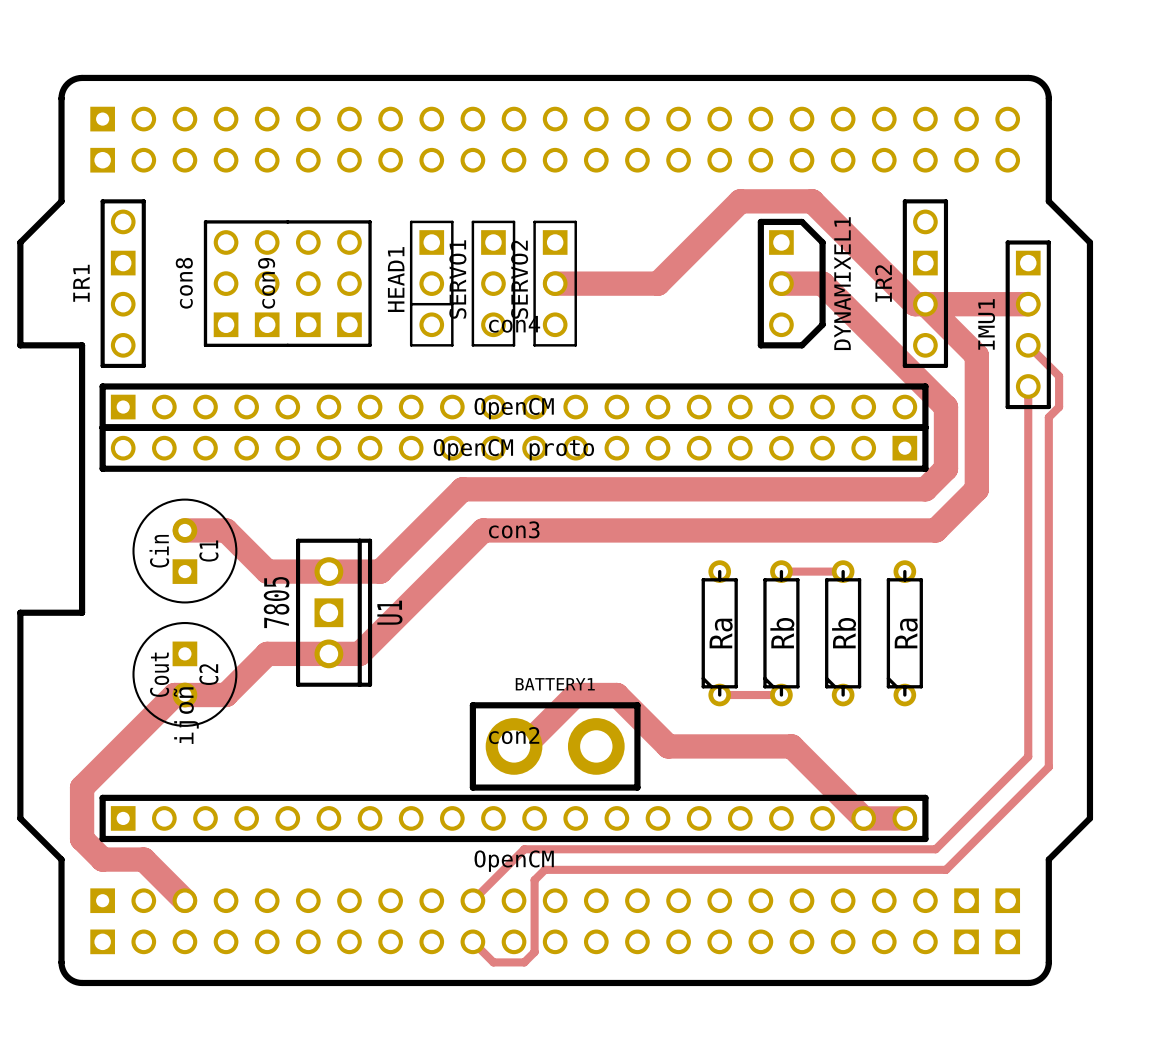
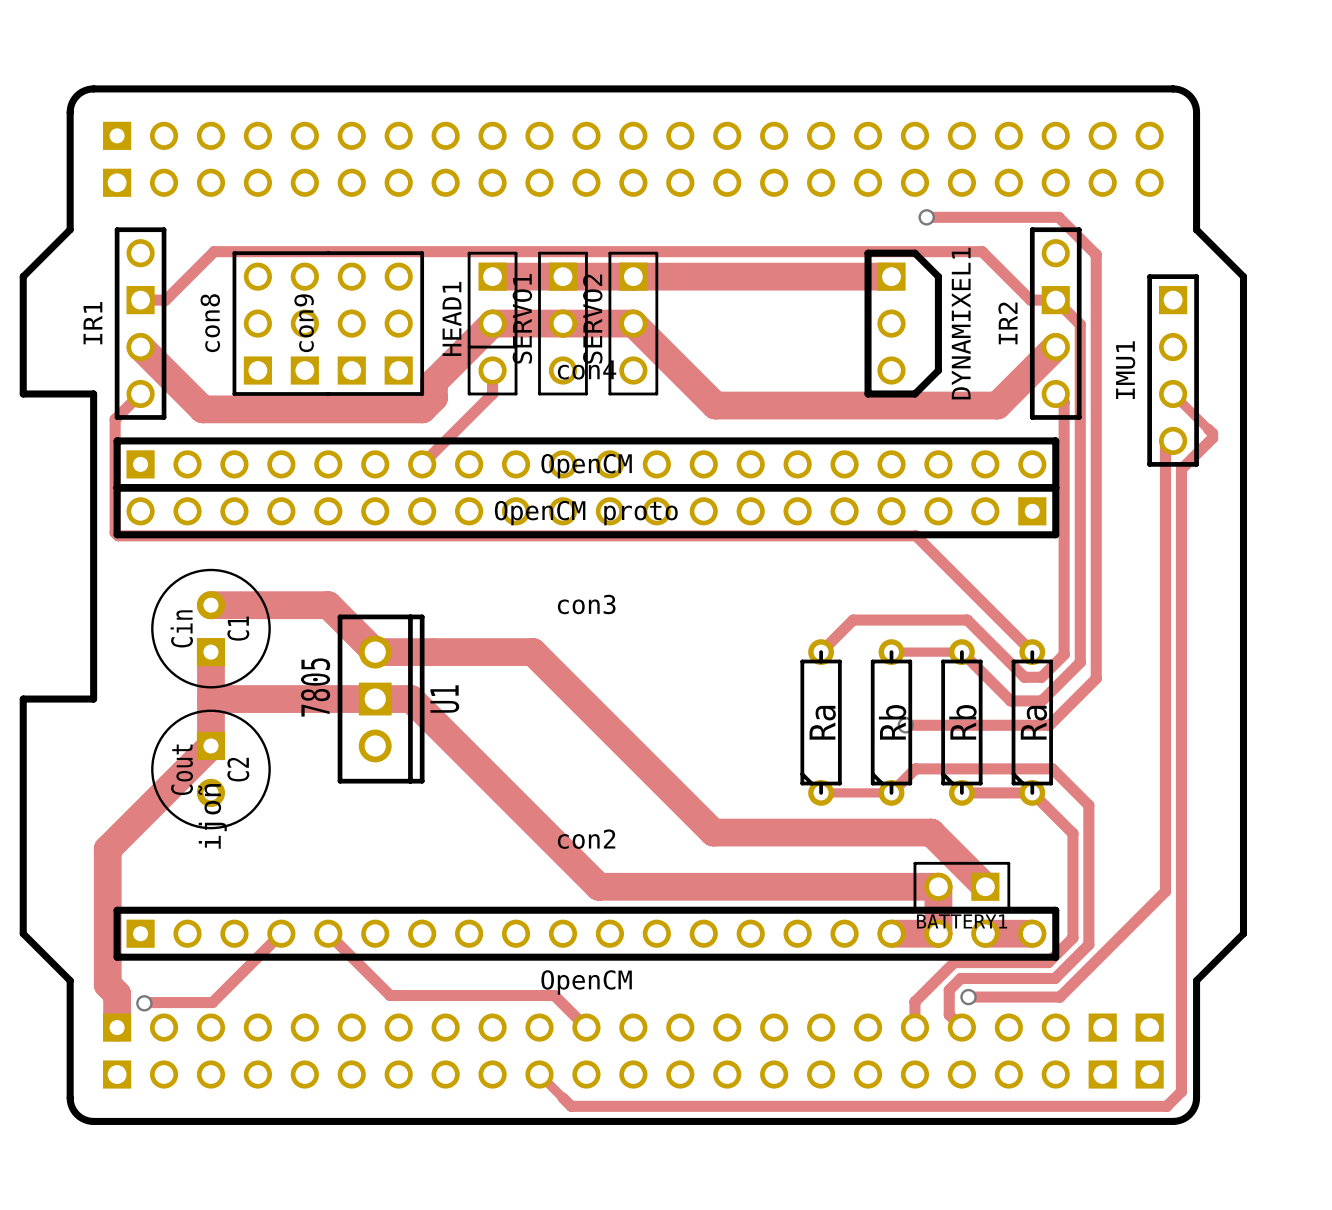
track: none -> (926, 217) (1058, 217) (1096, 254) (1096, 678) (1049, 725) (905, 725)
via: none -> (926, 217)
track: none -> (492, 276) (891, 276)
track: none -> (140, 300) (165, 300) (214, 251) (982, 251) (1030, 300) (1055, 300) (1080, 324) (1080, 662) (1041, 700) (1010, 700) (961, 652)
track: (555, 283) (658, 283) (740, 201) (812, 201) (915, 304) (1028, 304) -> none
track: (781, 283) (822, 283) (945, 407) (945, 468) (925, 489) (462, 489) (380, 571) -> (985, 886) (931, 832) (713, 832) (532, 652) (433, 652)
track: (925, 304) (976, 355) (976, 489) (935, 530) (483, 530) (359, 653) (267, 653) (226, 695) (174, 695) (82, 787) (82, 839) (102, 859) (143, 859) (184, 900) -> (1055, 347) (997, 405) (715, 405) (633, 323) (492, 323) (433, 382) (433, 397) (422, 409) (202, 409) (140, 347)
track: none -> (492, 370) (492, 393) (422, 464)
track: none -> (140, 393) (115, 419) (115, 532) (118, 535) (916, 535) (1032, 652)
track: none -> (1055, 393) (1064, 402) (1064, 654) (1041, 677) (1024, 677) (967, 620) (853, 620) (821, 652)
track: (1059, 376) (1059, 407) (1048, 417) (1048, 767) (945, 869) (544, 869) (534, 880) (534, 952) (524, 962) (493, 962) -> (1208, 429) (1212, 433) (1212, 438) (1181, 469) (1181, 1091) (1166, 1106) (571, 1106) (562, 1097)
track: (1028, 386) (1028, 756) (935, 849) (524, 849) (472, 900) -> (1173, 440) (1165, 448) (1165, 891) (1059, 997) (968, 997)
track: (226, 530) (267, 571) (328, 571) -> (257, 605) (328, 605) (375, 652)
track: none -> (210, 652) (210, 745) (107, 849) (107, 984) (117, 994) (117, 1027)
track: none -> (210, 699) (411, 699) (598, 886) (938, 886) (938, 933) (891, 933)
via: none -> (905, 725)
BATTERY1 name position: BATTERY1 (555, 684) -> BATTERY1 (962, 921)
track: none -> (891, 792) (915, 768) (1052, 768) (1088, 805) (1088, 944) (1055, 978) (960, 978) (949, 990) (949, 1014) (961, 1027)
track: none -> (961, 792) (1032, 792) (1072, 833) (1072, 938) (1048, 962) (954, 962) (914, 1001) (914, 1027)
BATTERY1 footprint: [469, 702, 641, 791] -> [913, 861, 1011, 912]
track: (514, 746) (524, 746) (575, 695) (616, 695) (668, 746) (791, 746) (863, 818) -> none
track: none -> (281, 933) (212, 1002) (144, 1003)
track: none -> (328, 933) (390, 995) (554, 995) (586, 1027)
via: none -> (968, 997)
via: none -> (144, 1003)

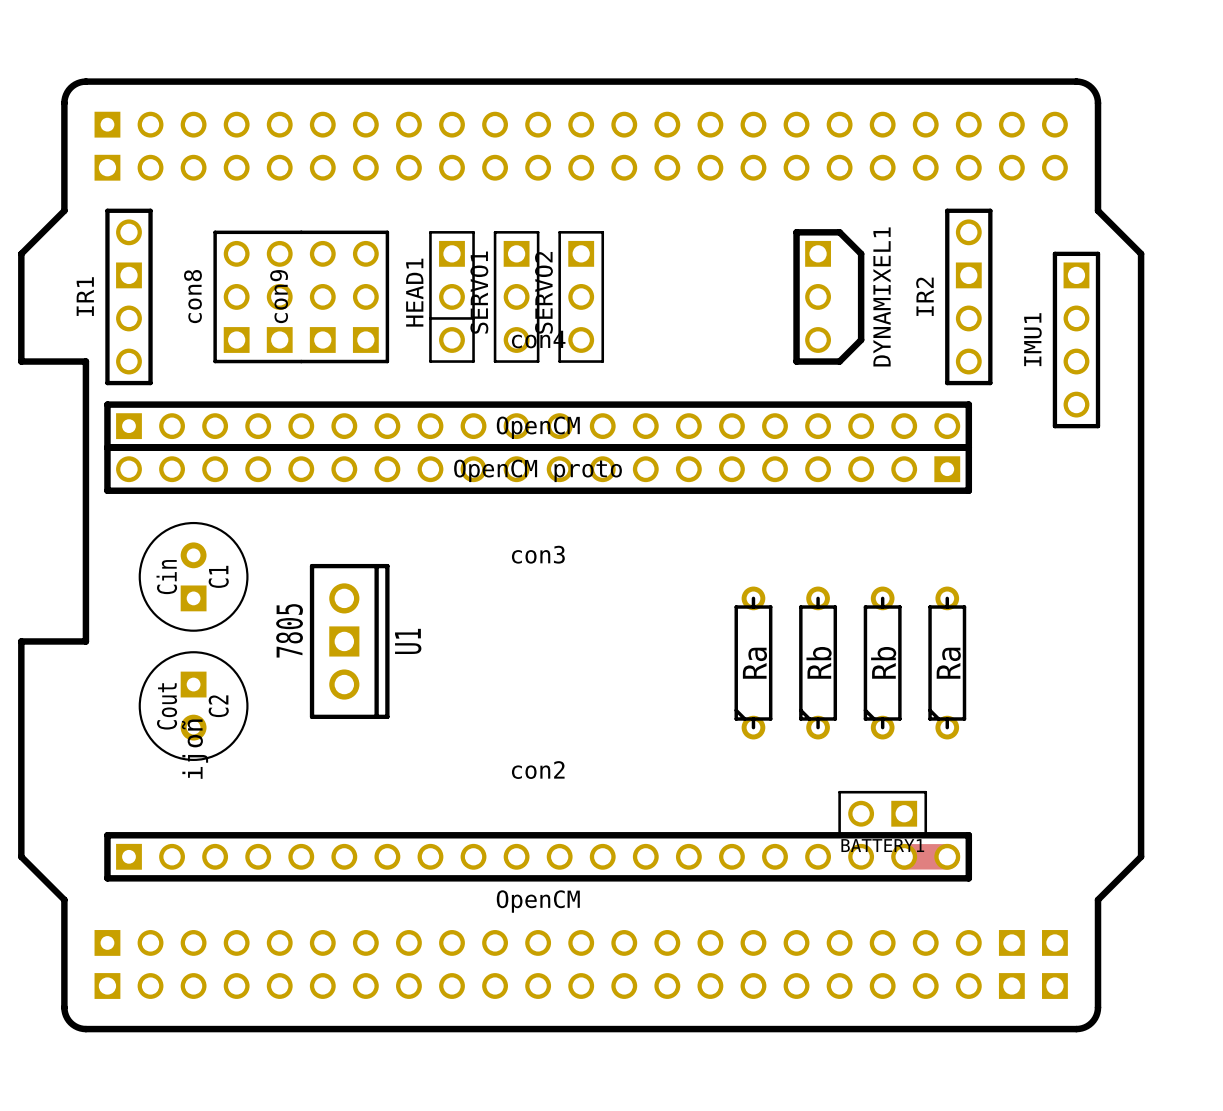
track: (926, 217) (1058, 217) (1096, 254) (1096, 678) (1049, 725) (905, 725) -> none
via: (926, 217) -> none
track: (492, 276) (891, 276) -> none
track: (140, 300) (165, 300) (214, 251) (982, 251) (1030, 300) (1055, 300) (1080, 324) (1080, 662) (1041, 700) (1010, 700) (961, 652) (891, 652) -> none
track: (140, 347) (202, 409) (422, 409) (433, 397) (433, 382) (492, 323) (633, 323) (715, 405) (997, 405) (1055, 347) -> none
track: (492, 370) (492, 393) (422, 464) -> none
track: (140, 393) (115, 419) (115, 532) (118, 535) (916, 535) (1032, 652) -> none
track: (1055, 393) (1064, 402) (1064, 654) (1041, 677) (1024, 677) (967, 620) (853, 620) (821, 652) -> none
track: (1173, 393) (1212, 433) (1212, 438) (1181, 469) (1181, 1091) (1166, 1106) (571, 1106) (539, 1074) -> none
track: (1173, 440) (1165, 448) (1165, 891) (1059, 997) (968, 997) -> none
track: (210, 605) (328, 605) (375, 652) (532, 652) (713, 832) (931, 832) (985, 886) -> none
track: (210, 652) (210, 745) (107, 849) (107, 984) (117, 994) (117, 1027) -> none
track: (210, 699) (411, 699) (598, 886) (938, 886) (938, 933) (891, 933) -> none
via: (905, 725) -> none
track: (821, 792) (891, 792) (915, 768) (1052, 768) (1088, 805) (1088, 944) (1055, 978) (960, 978) (949, 990) (949, 1014) (961, 1027) -> none
track: (961, 792) (1032, 792) (1072, 833) (1072, 938) (1048, 962) (954, 962) (914, 1001) (914, 1027) -> none
track: (281, 933) (212, 1002) (144, 1003) -> none
track: (328, 933) (390, 995) (554, 995) (586, 1027) -> none
via: (968, 997) -> none
via: (144, 1003) -> none

